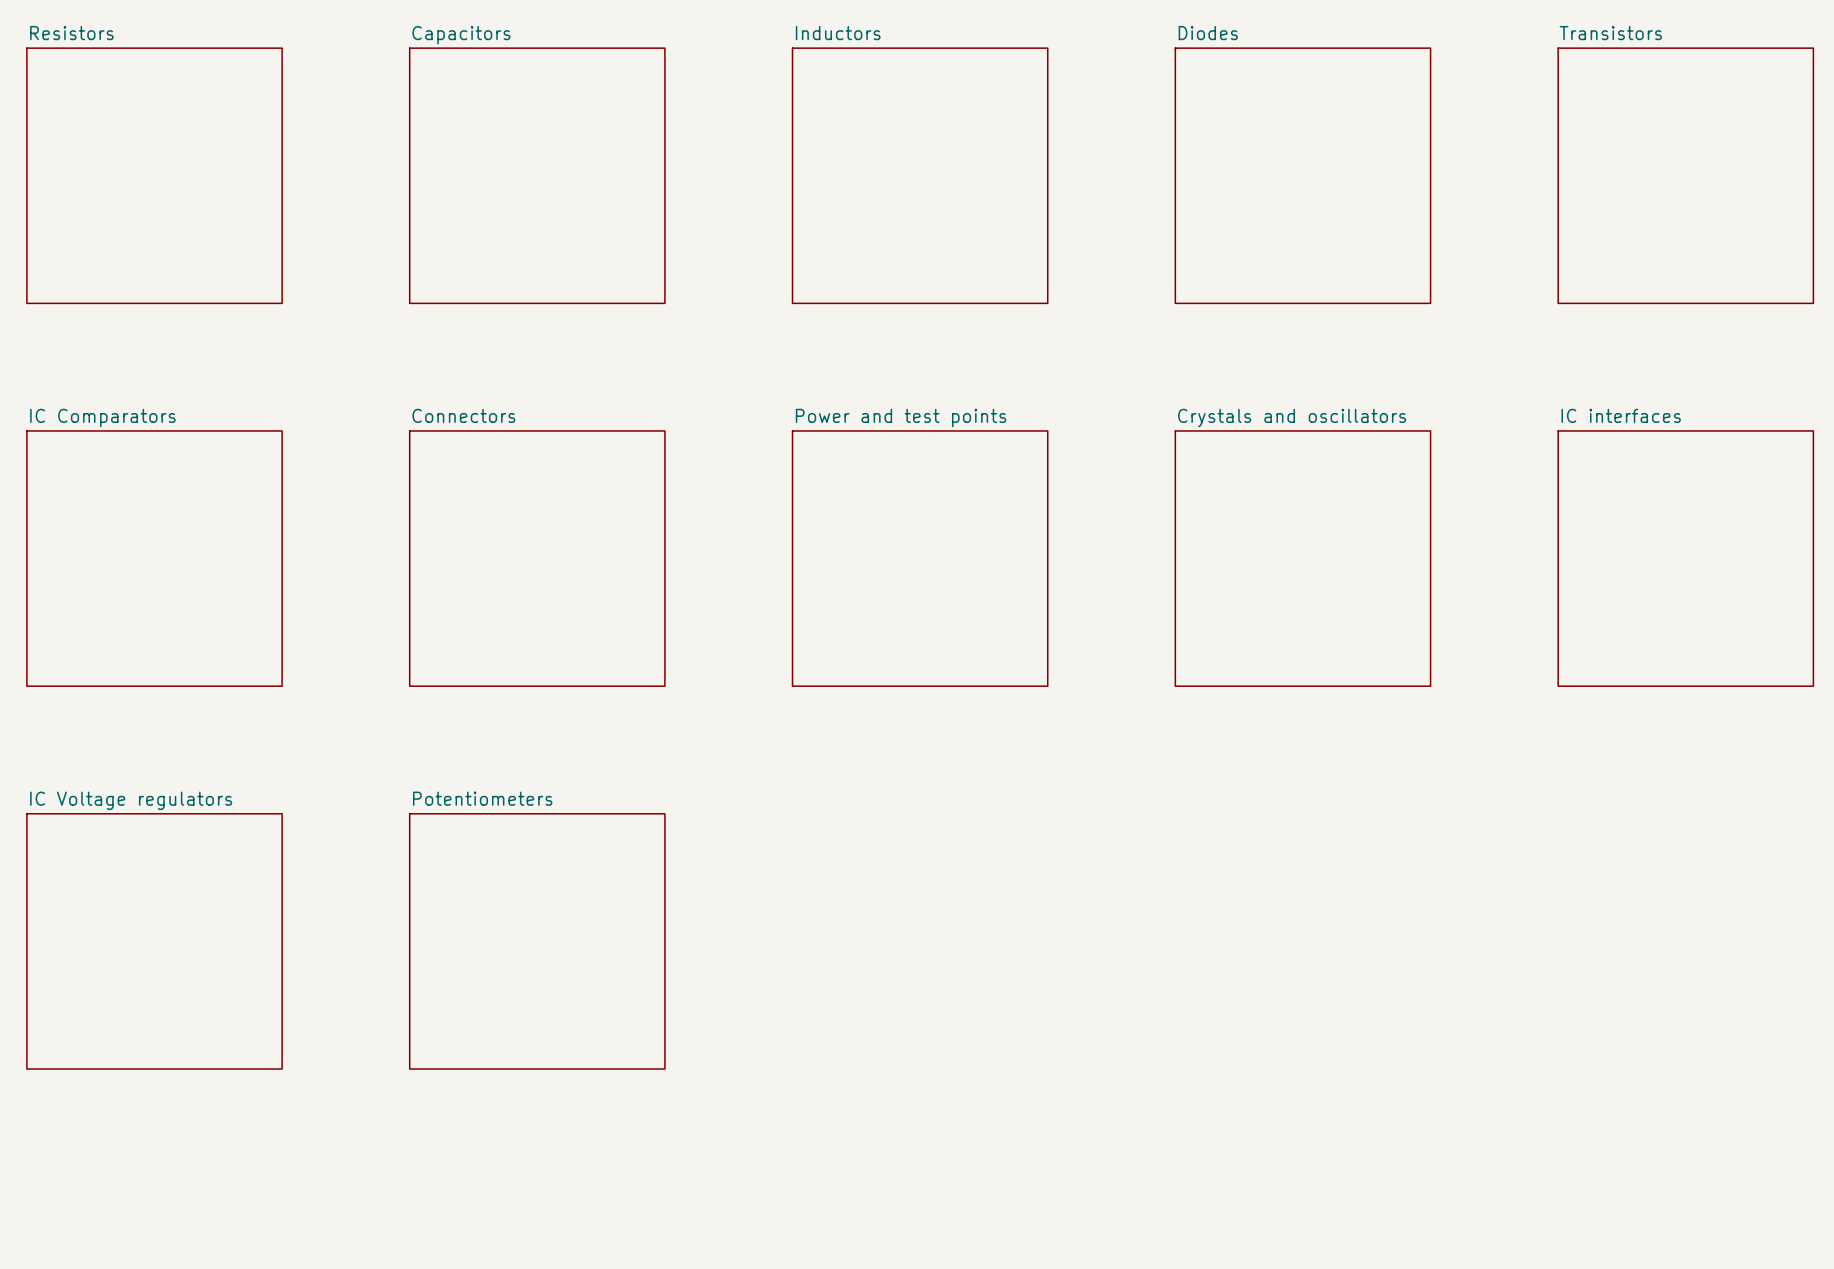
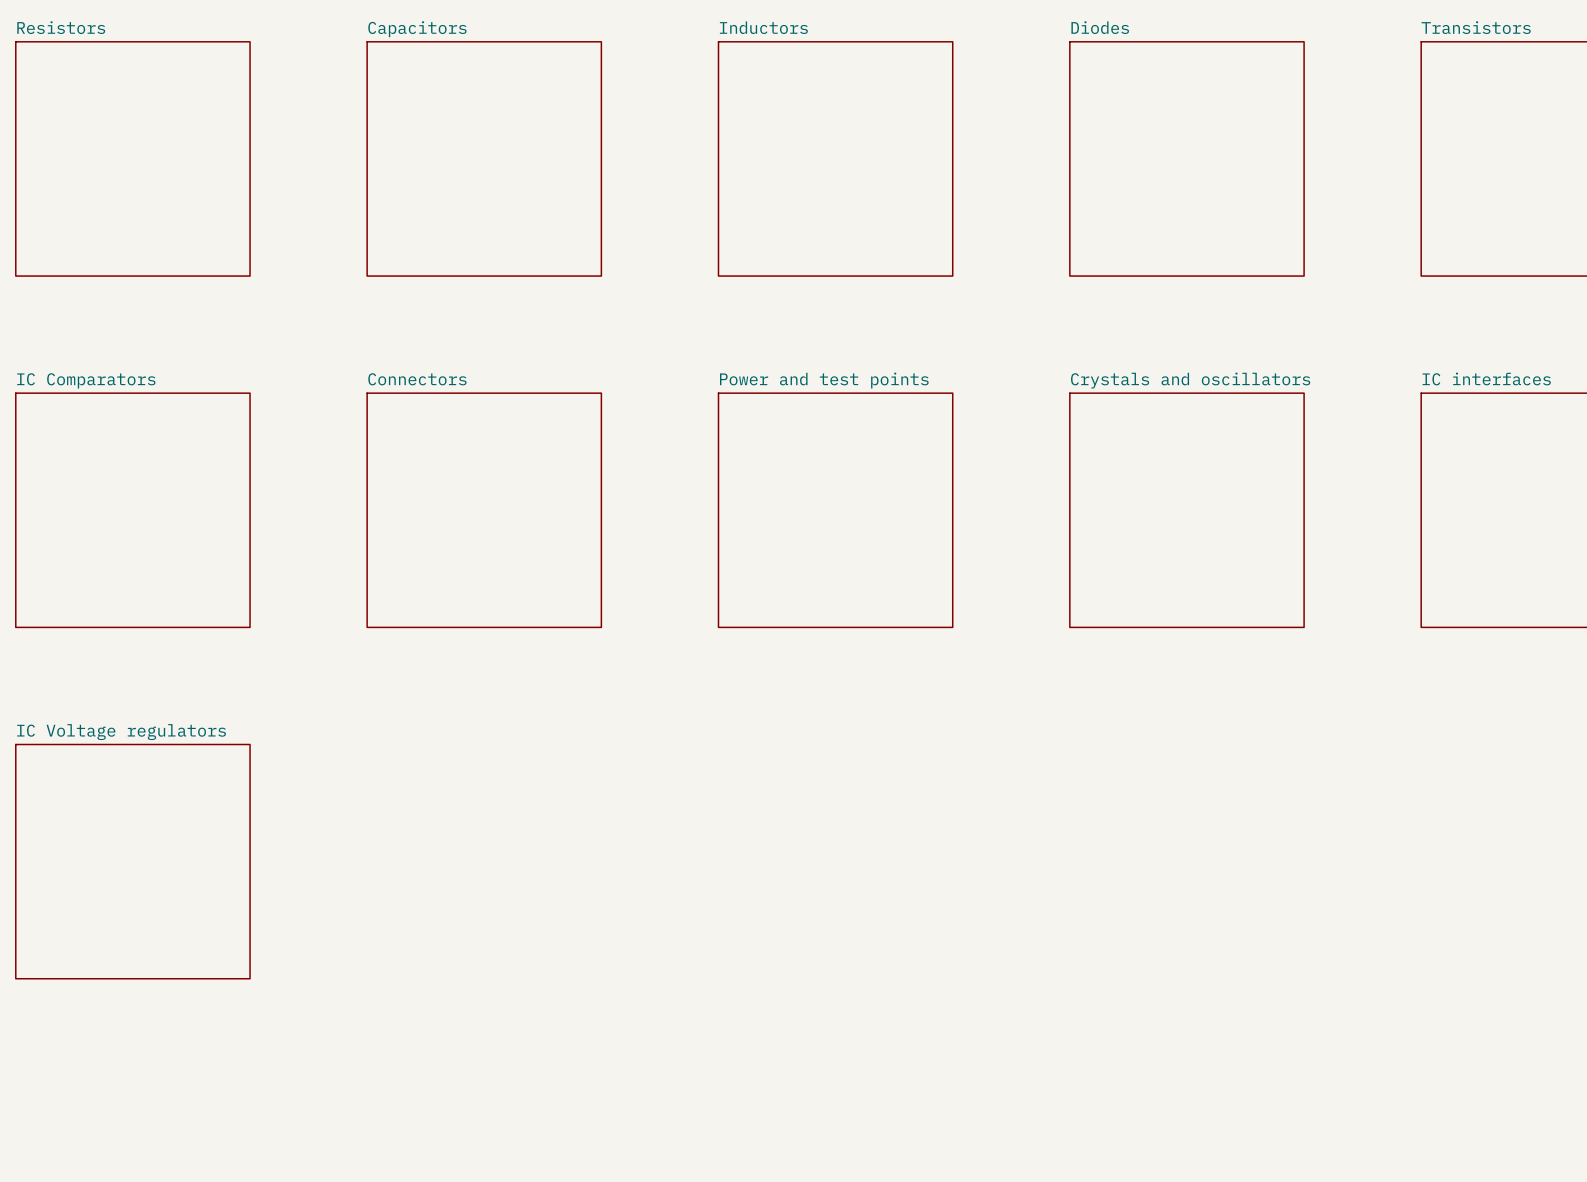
sheet Potentiometers: (537, 941) -> none

